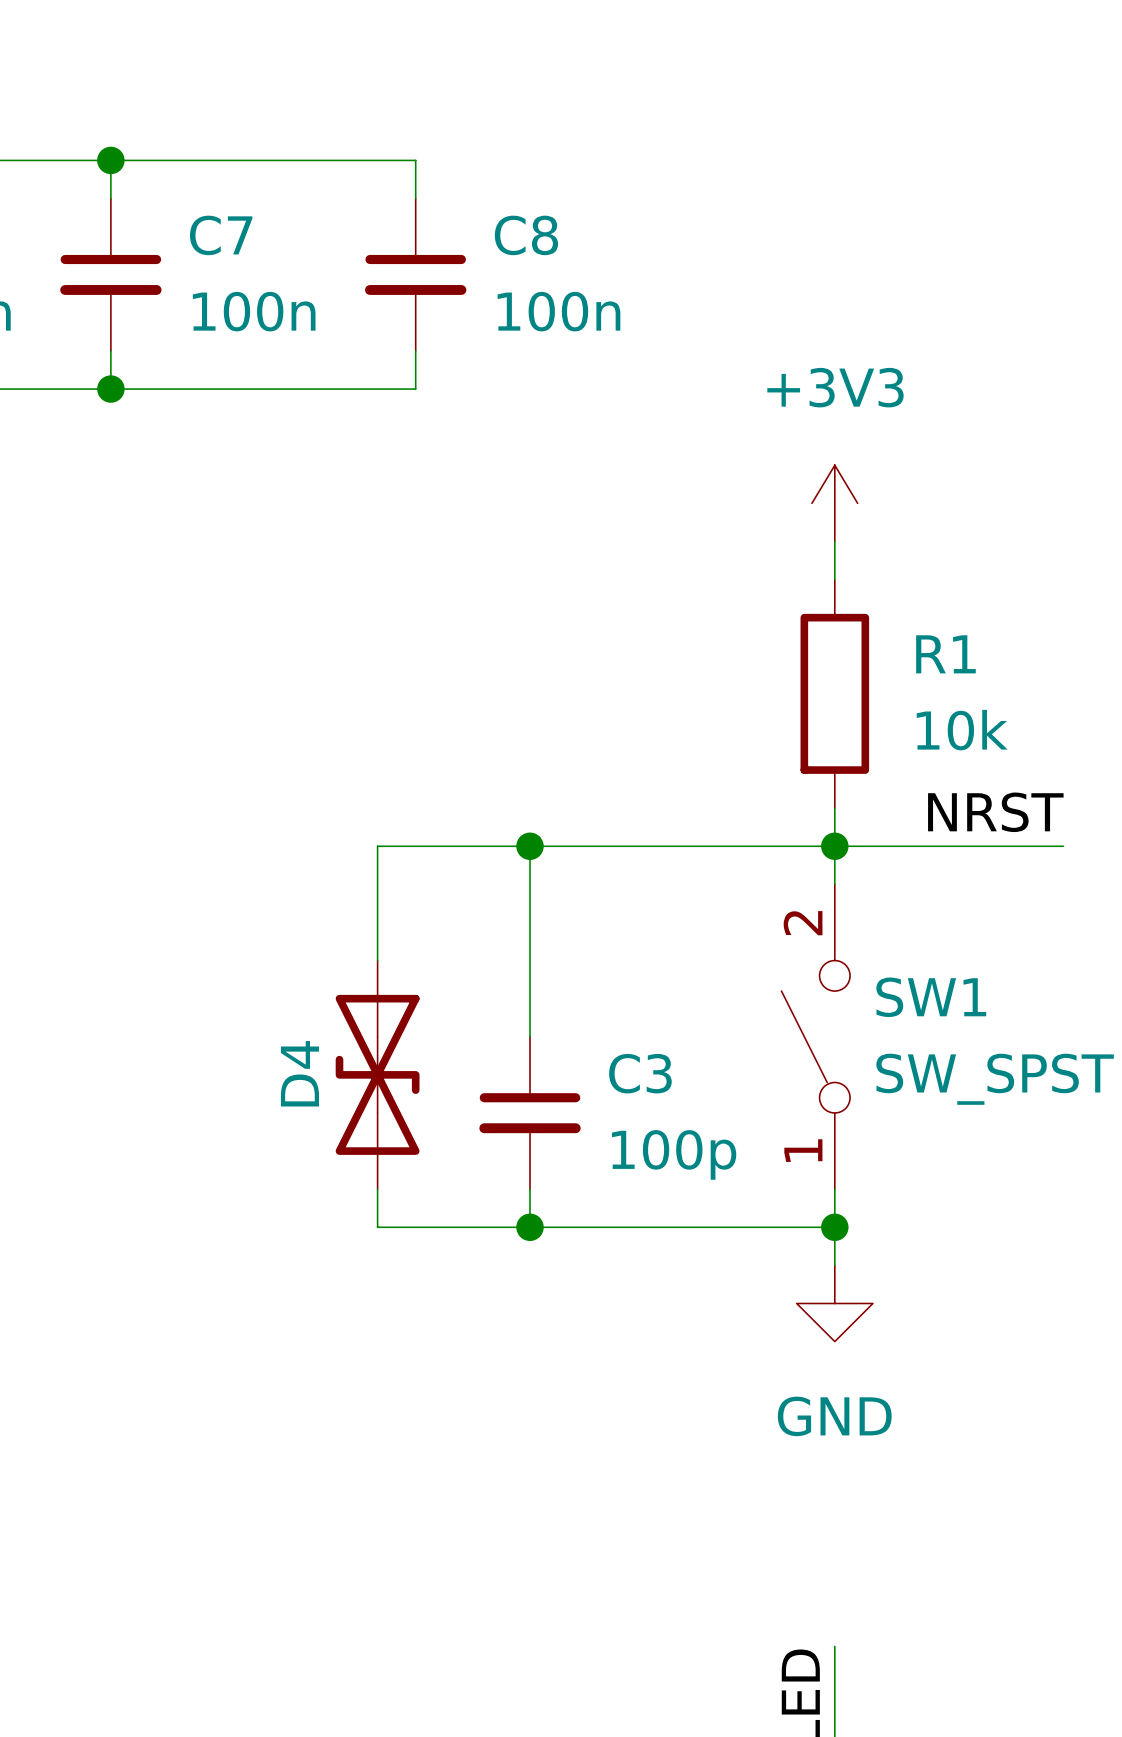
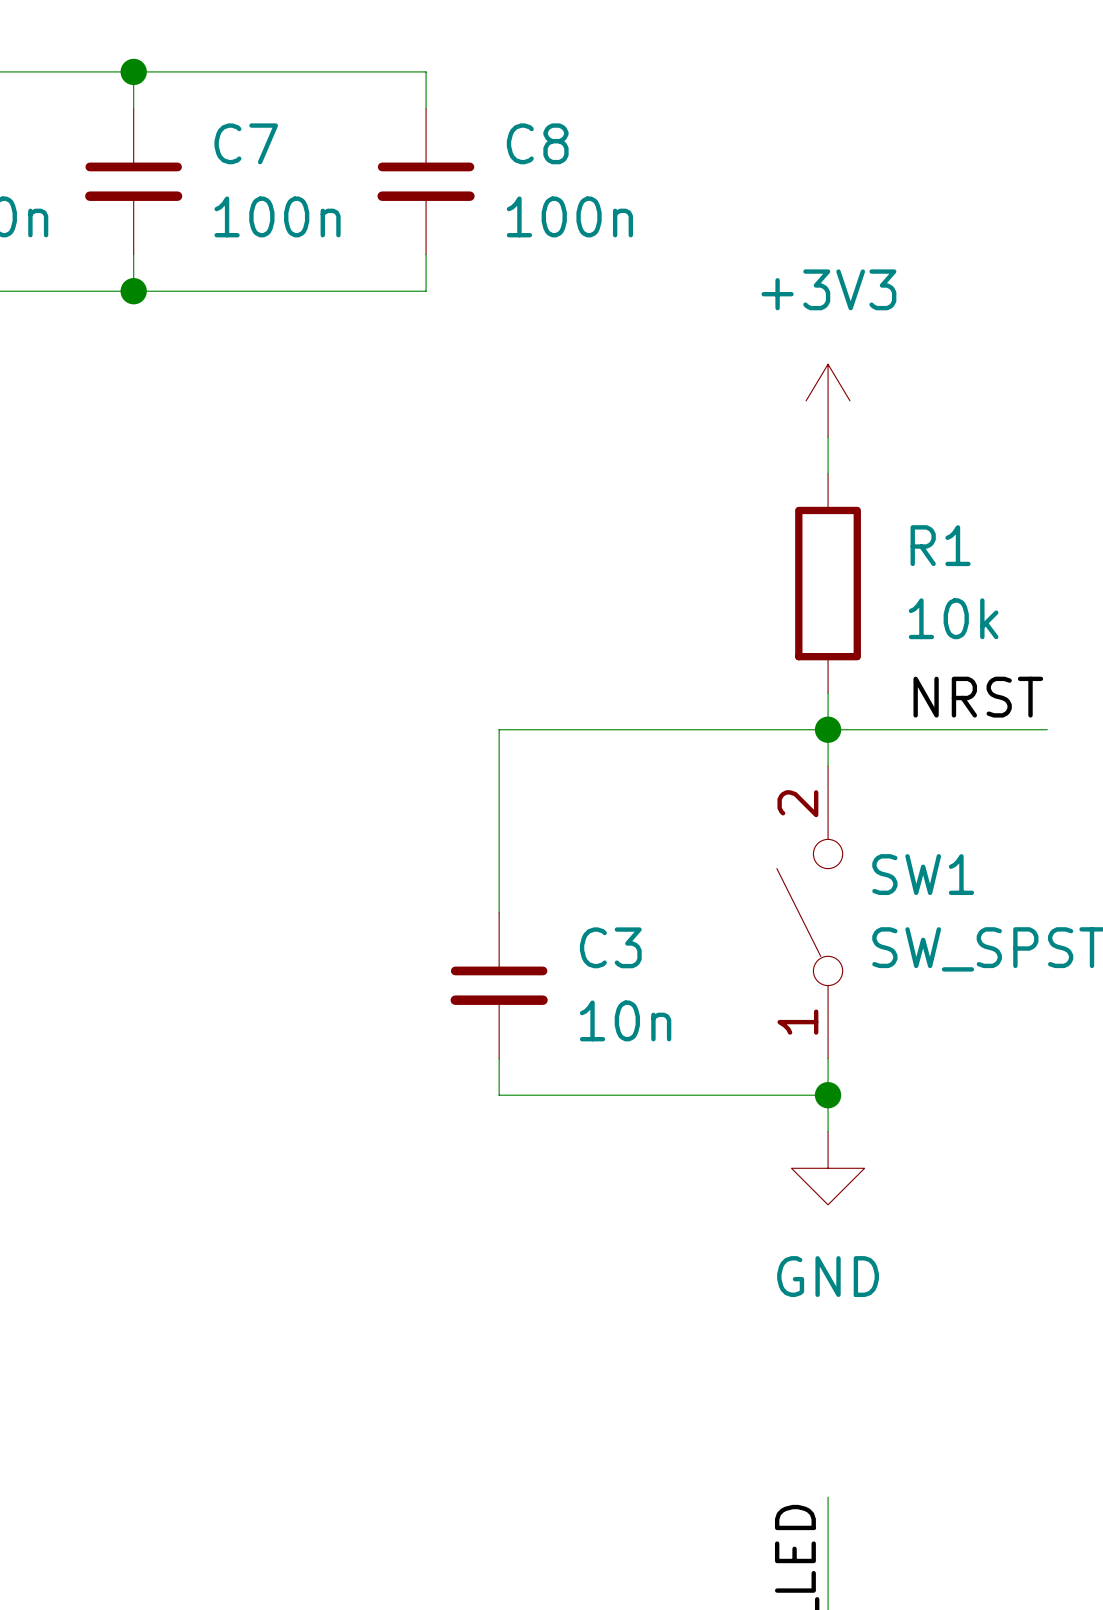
wire: (491, 846) (377, 846) (377, 960) -> (499, 729) (499, 912)
wire: (530, 846) (530, 1036) -> none
junction: (530, 846) -> none
D4: (377, 1074) -> none
C3 position: (530, 1112) -> (499, 985)
C3 value: 100p (674, 1154) -> 10n (625, 1020)
wire: (377, 1189) (377, 1227) (491, 1227) -> (499, 1058) (499, 1095)
wire: (530, 1189) (530, 1227) -> none
junction: (530, 1227) -> none

